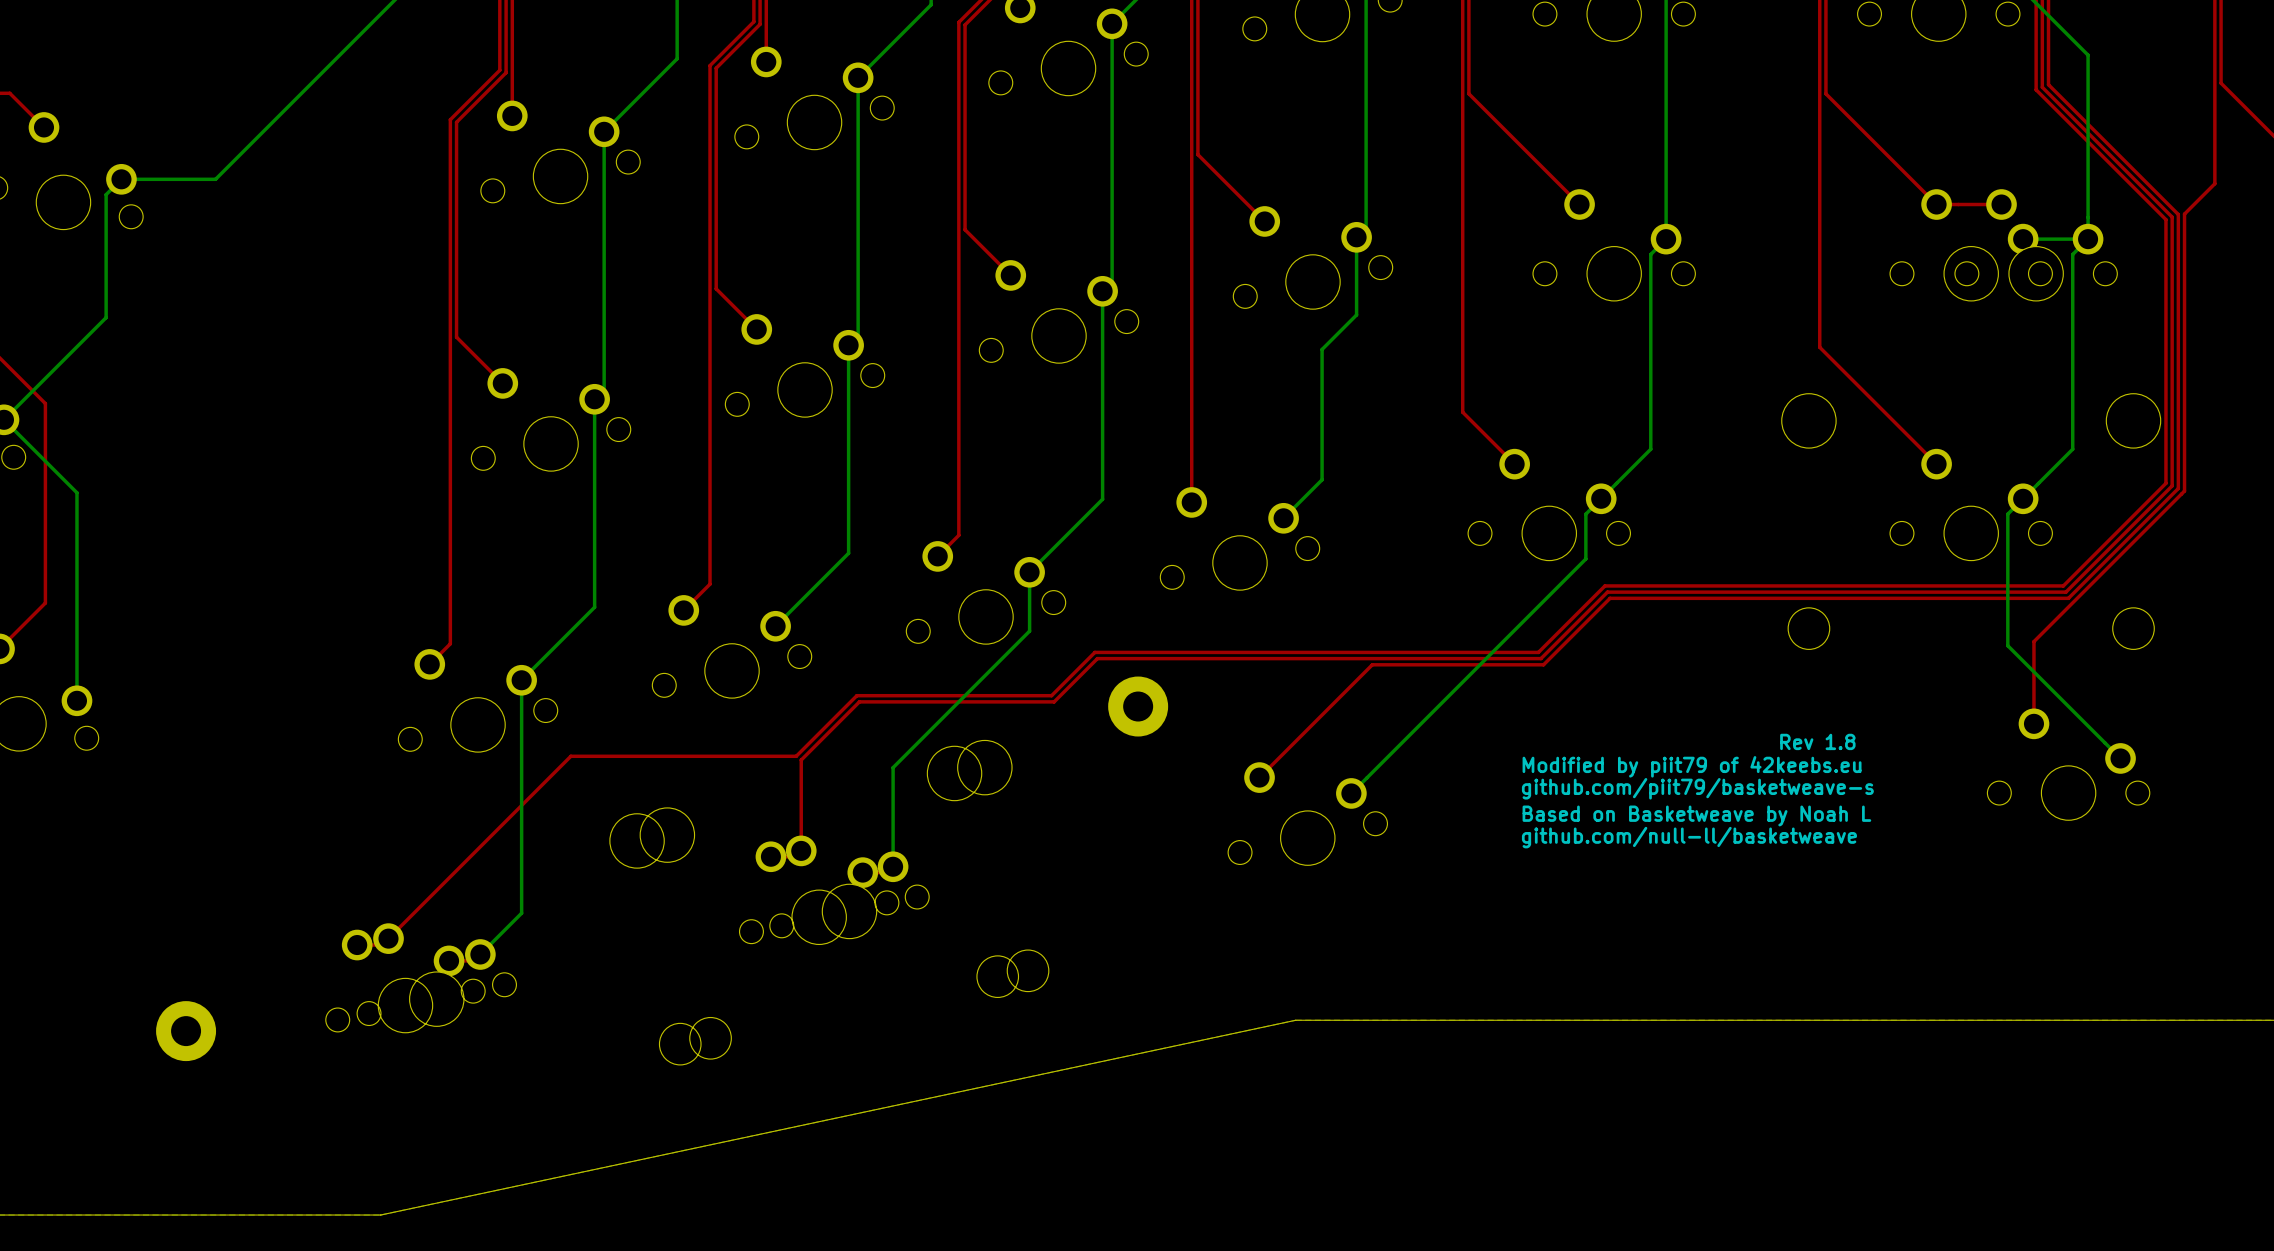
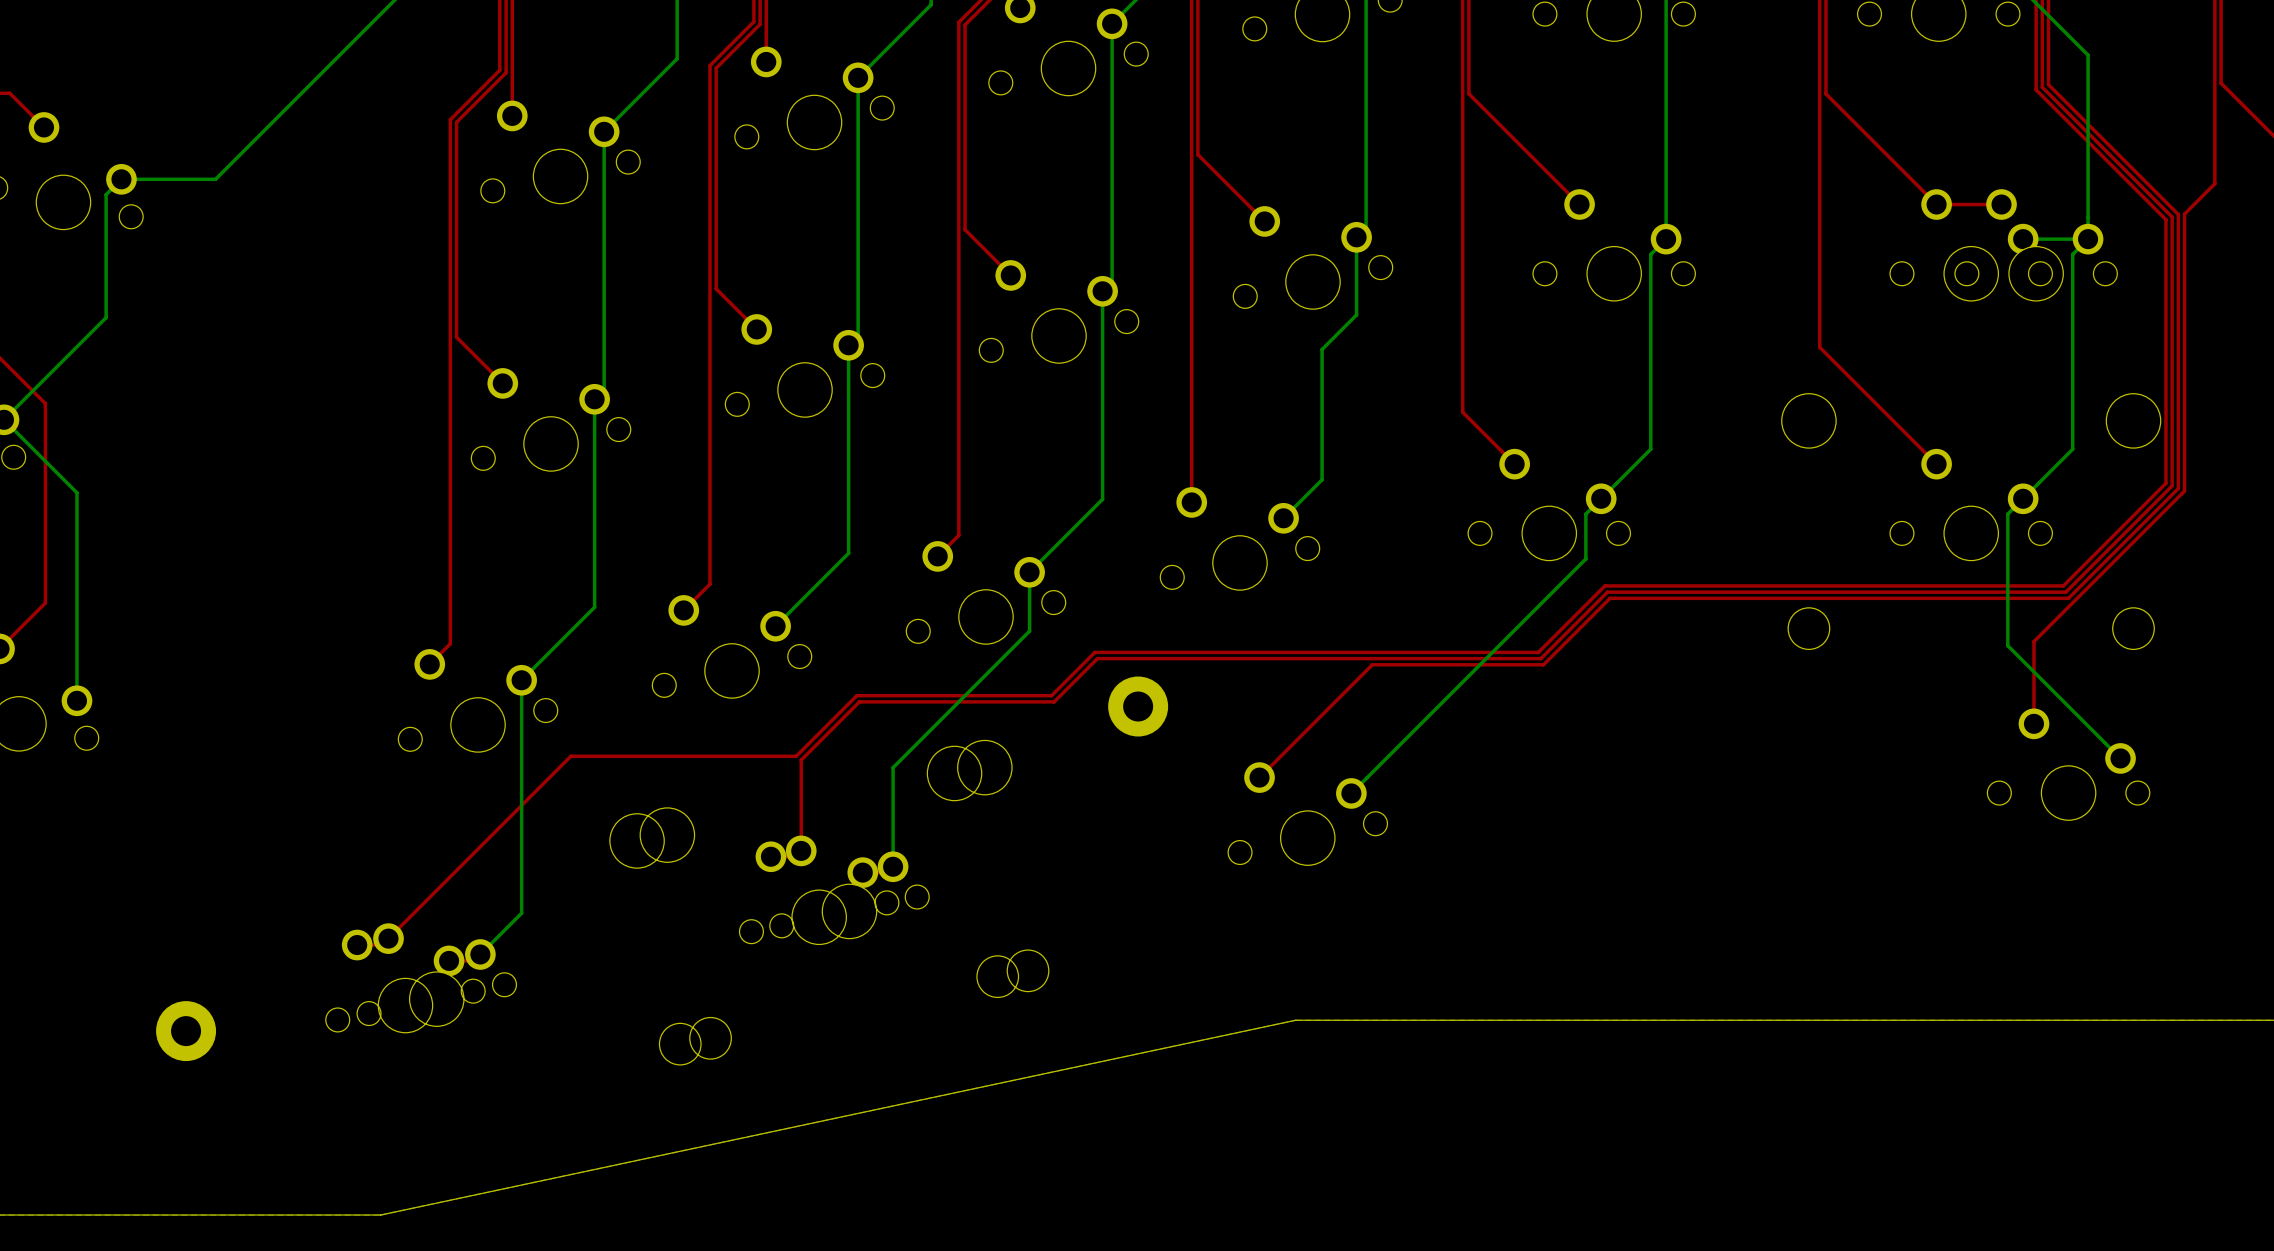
text: Rev 1.8 (1817, 741) -> none
text: Modified by piit79 of 42keebs.eu (1692, 766) -> none
text: github.com/piit79/basketweave-s (1697, 788) -> none
text: Based on Basketweave by Noah L (1696, 815) -> none
text: github.com/null-ll/basketweave (1689, 837) -> none

